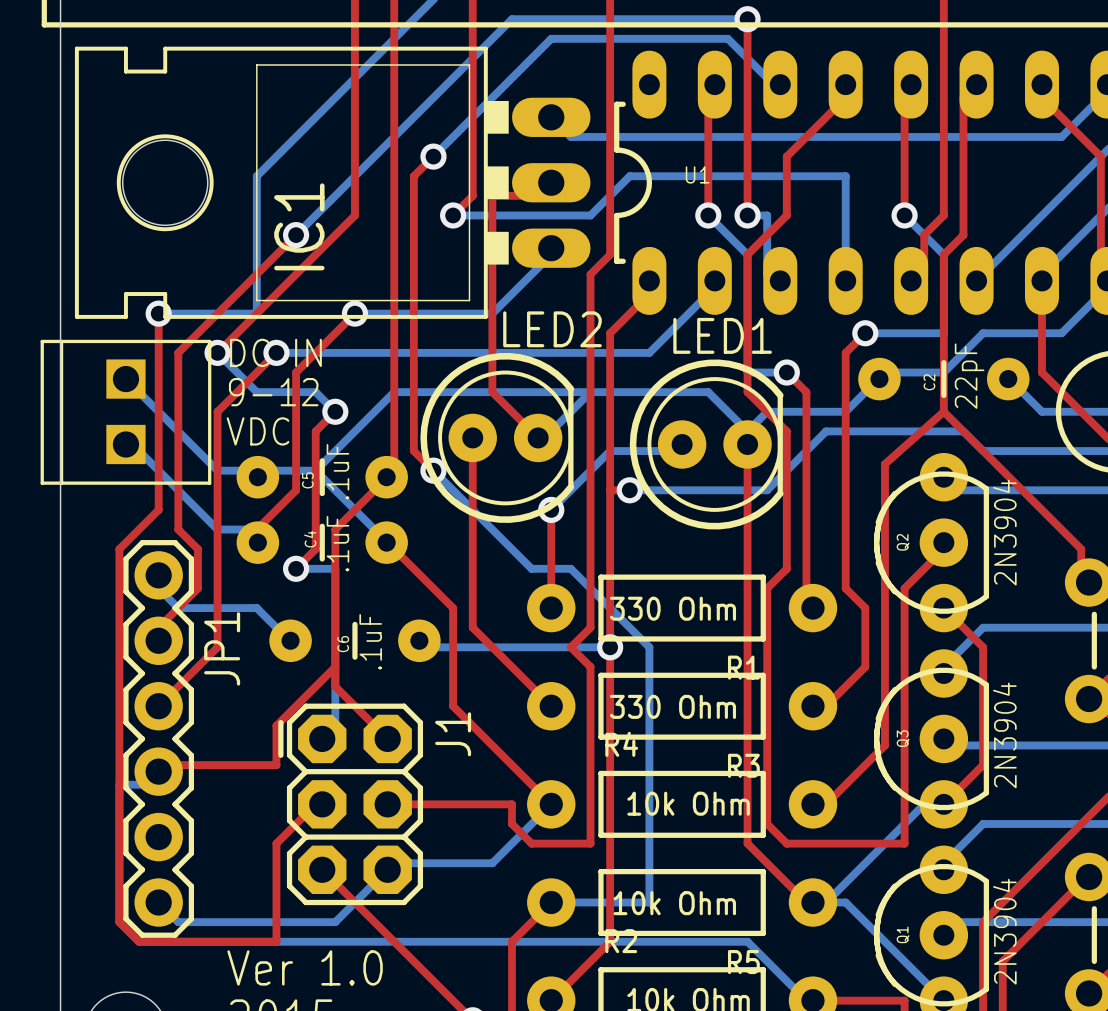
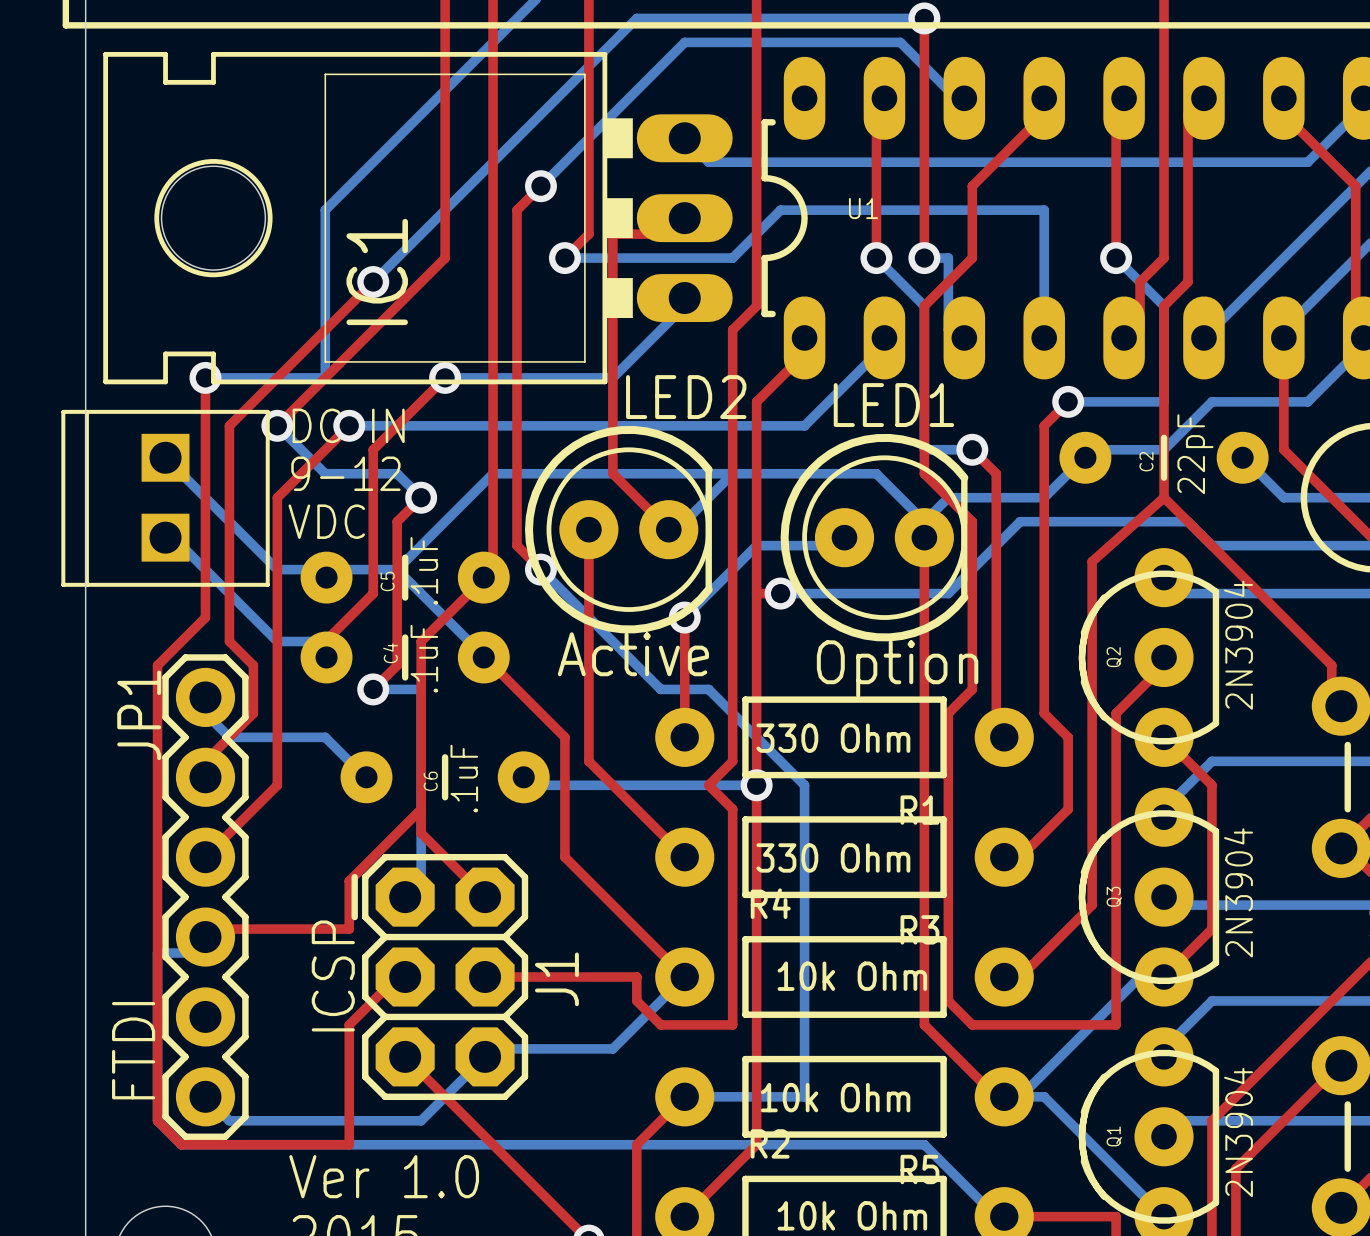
LED2 value: none -> Active (633, 654)
LED1 value: none -> Option (897, 668)
JP1 name position: JP1 (222, 648) -> JP1 (139, 715)
J1 name position: J1 (453, 734) -> J1 (556, 979)
J1 value: none -> ICSP (333, 975)
JP1 value: none -> FTDI (133, 1050)

